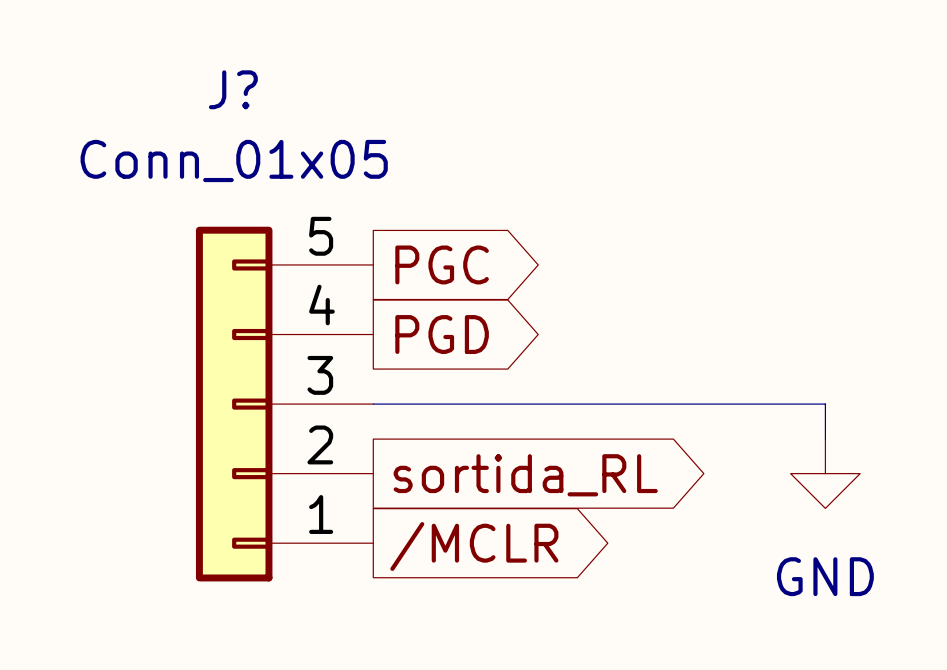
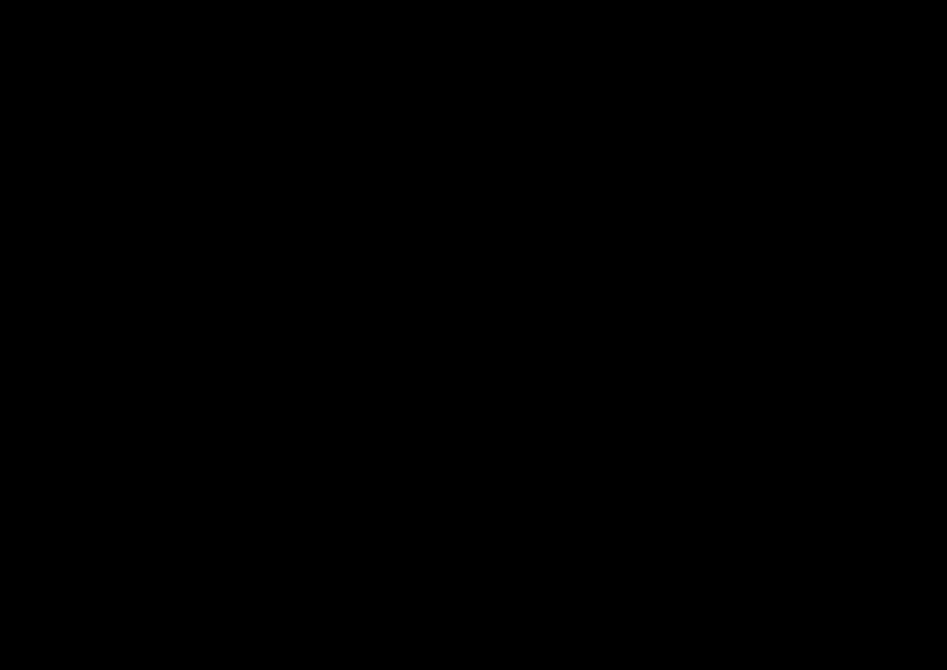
global label: PGC (442, 264) -> none
global label: PGD (442, 334) -> none
J?: Conn_01x05 (284, 404) -> none
wire: (373, 404) (825, 404) (825, 438) -> none
power symbol: GND (825, 473) -> none
global label: sortida_RL (525, 475) -> none
global label: /MCLR (474, 546) -> none

